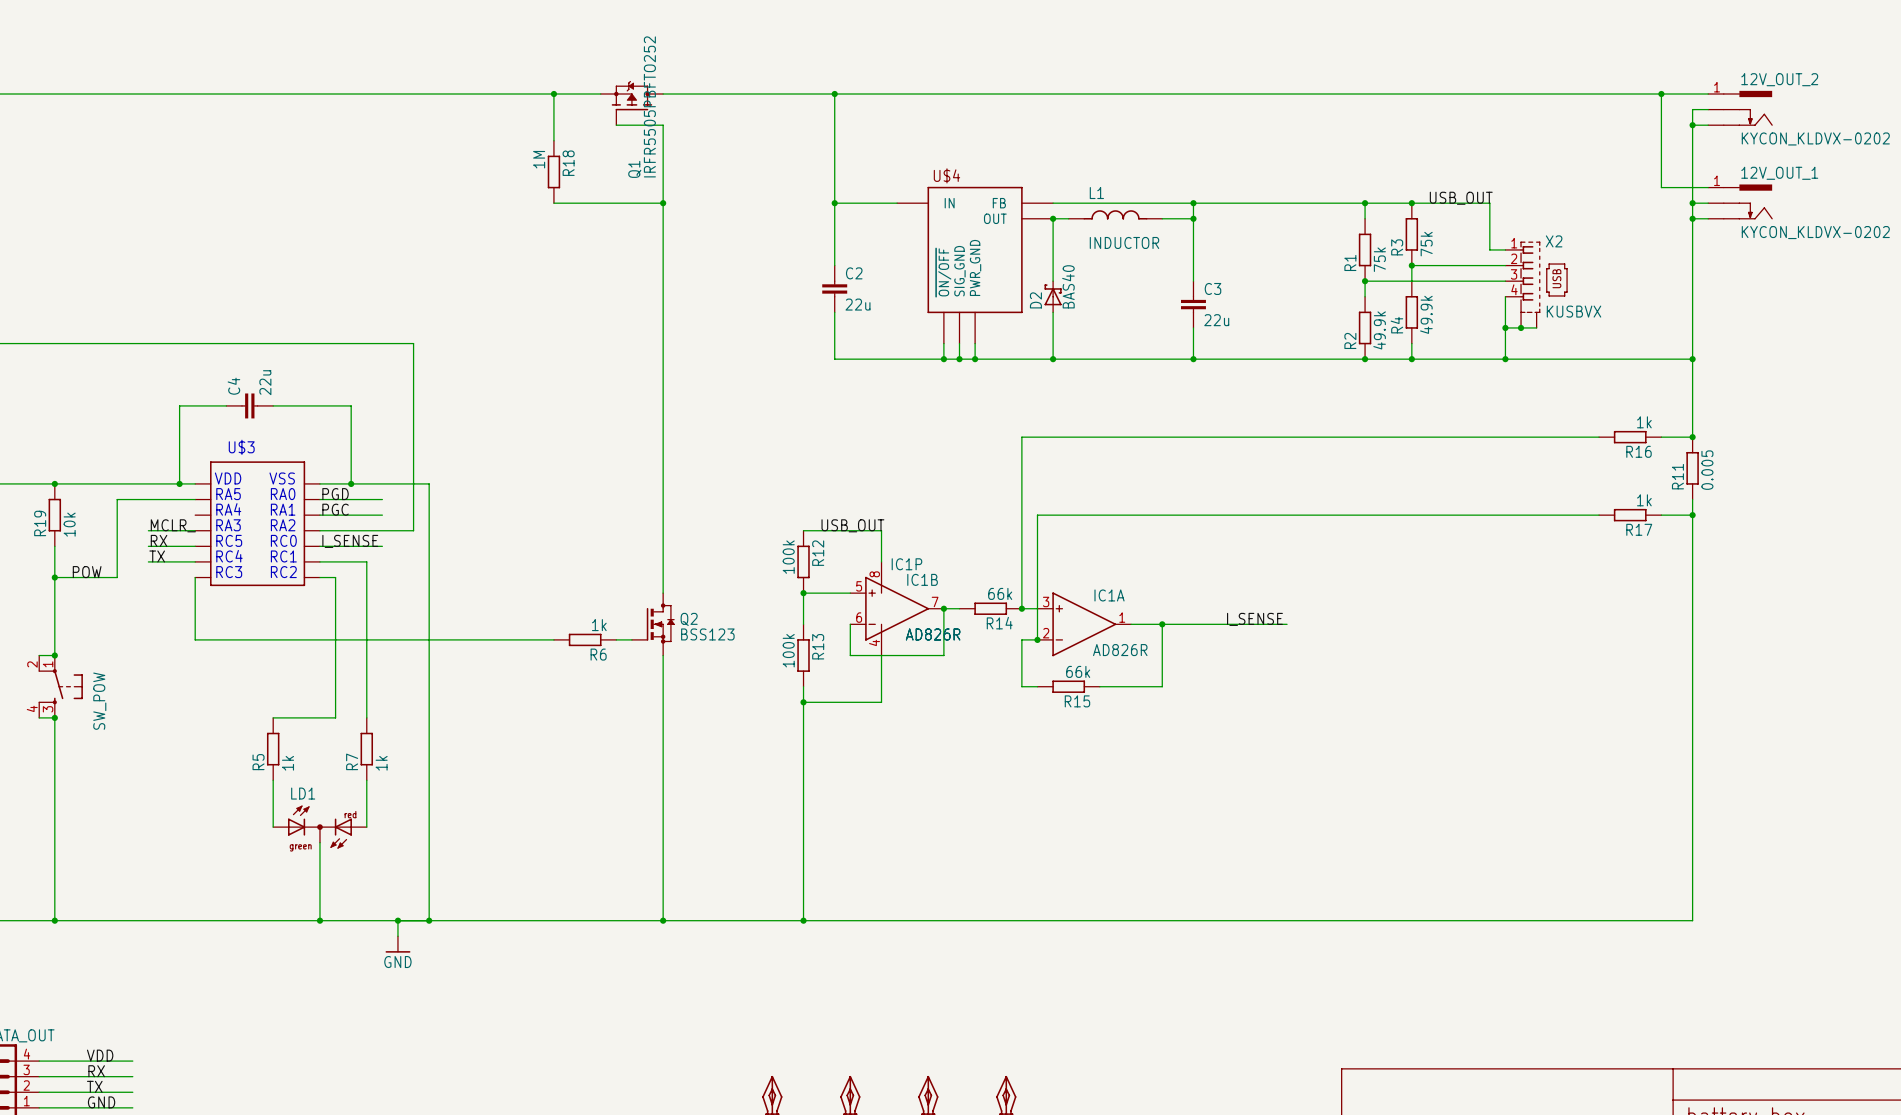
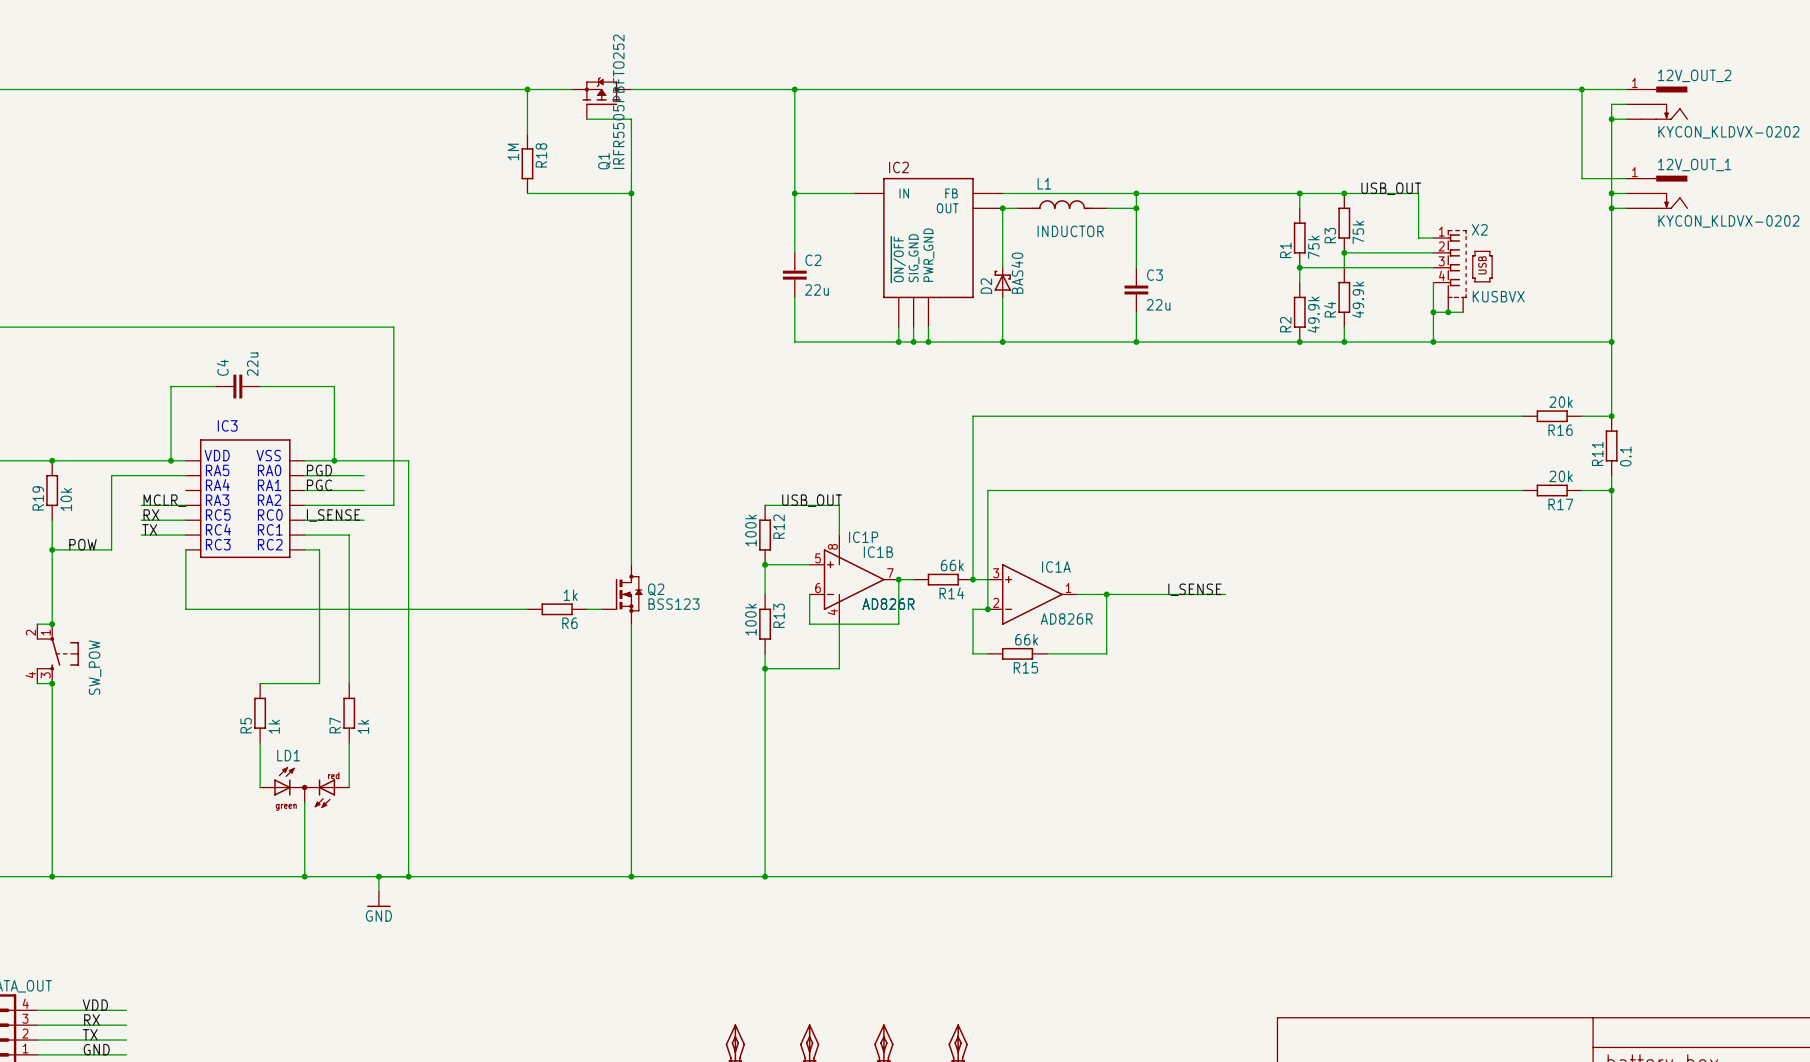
U$4 name: U$4 (946, 175) -> IC2 (899, 167)
R16 value: 1k (1644, 422) -> 20k (1561, 402)
U$3 name: U$3 (241, 447) -> IC3 (227, 425)
R11 value: 0.005 (1707, 470) -> 0.1 (1625, 456)
R17 value: 1k (1644, 500) -> 20k (1561, 476)

